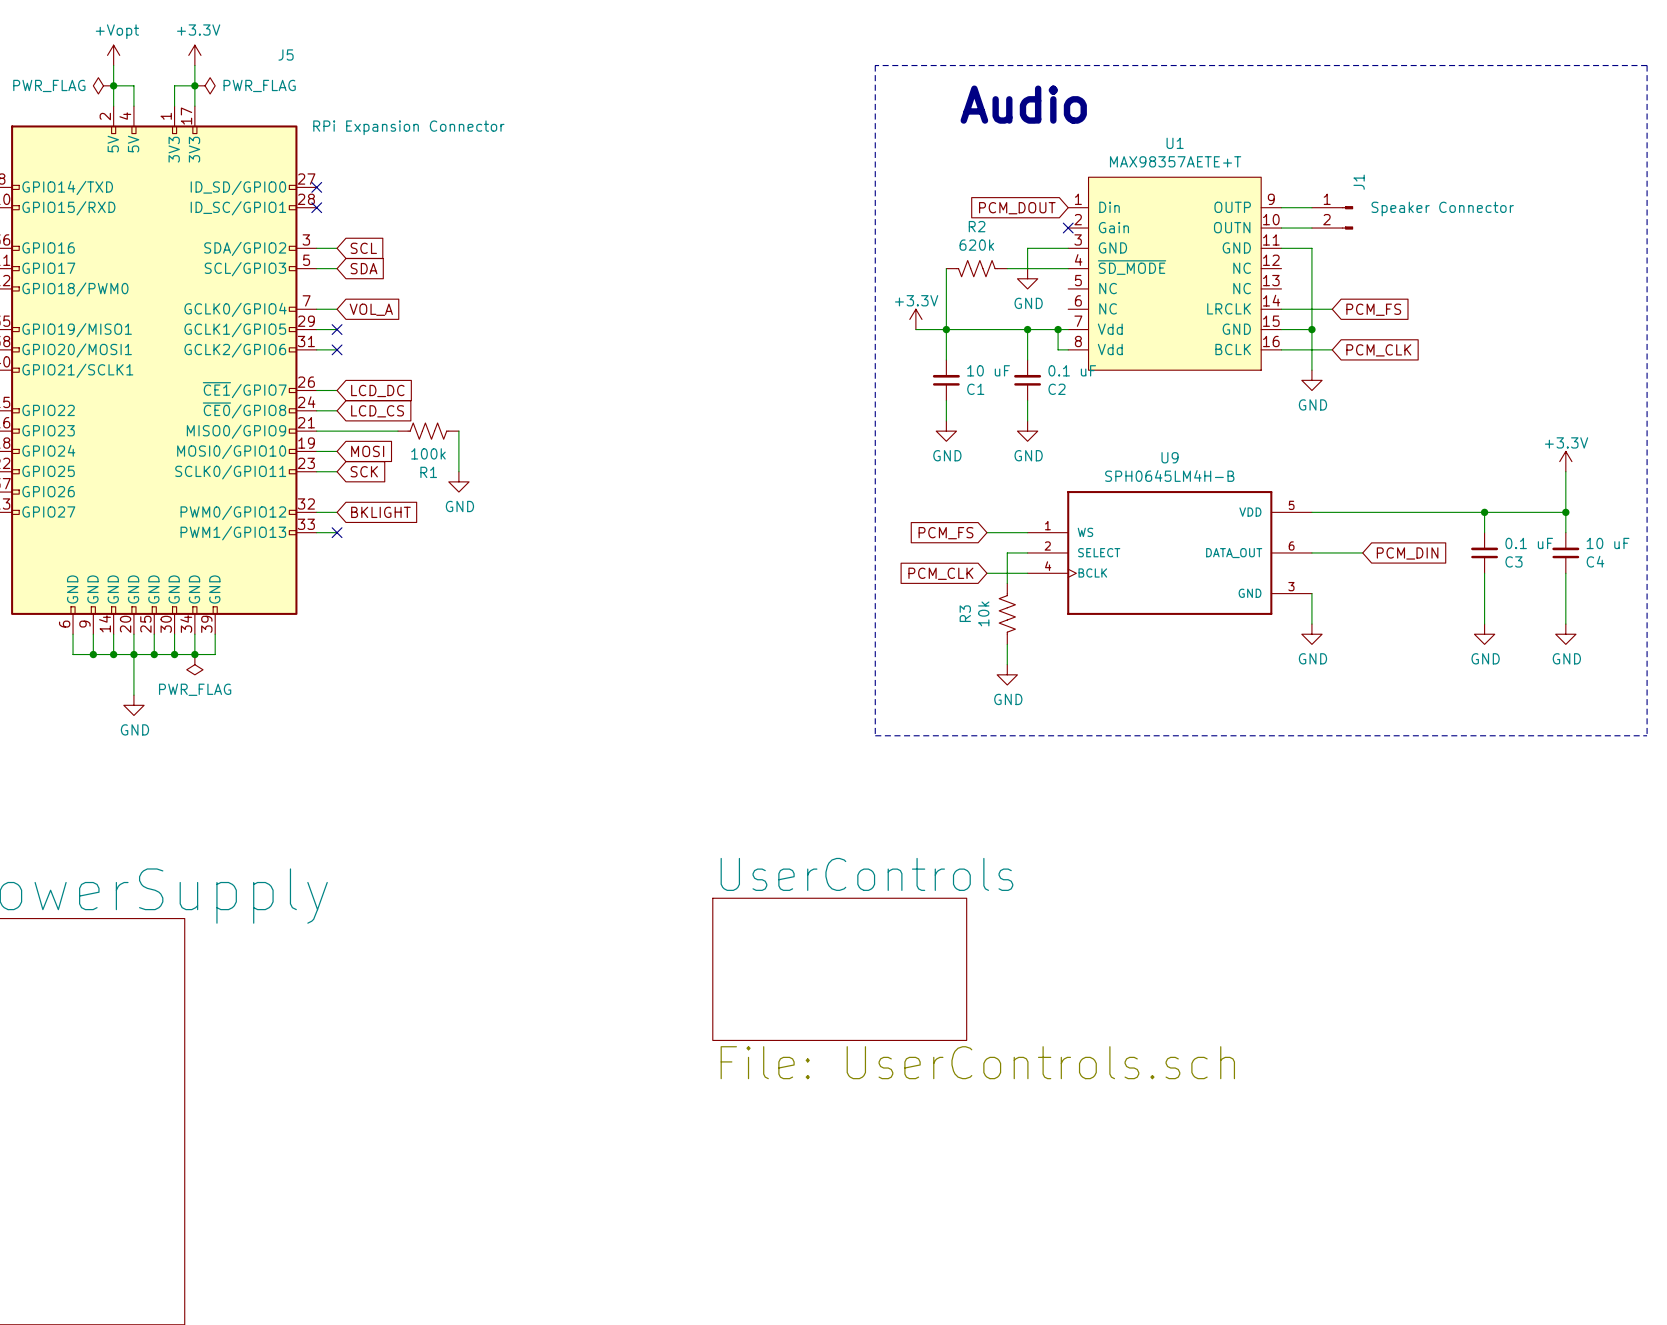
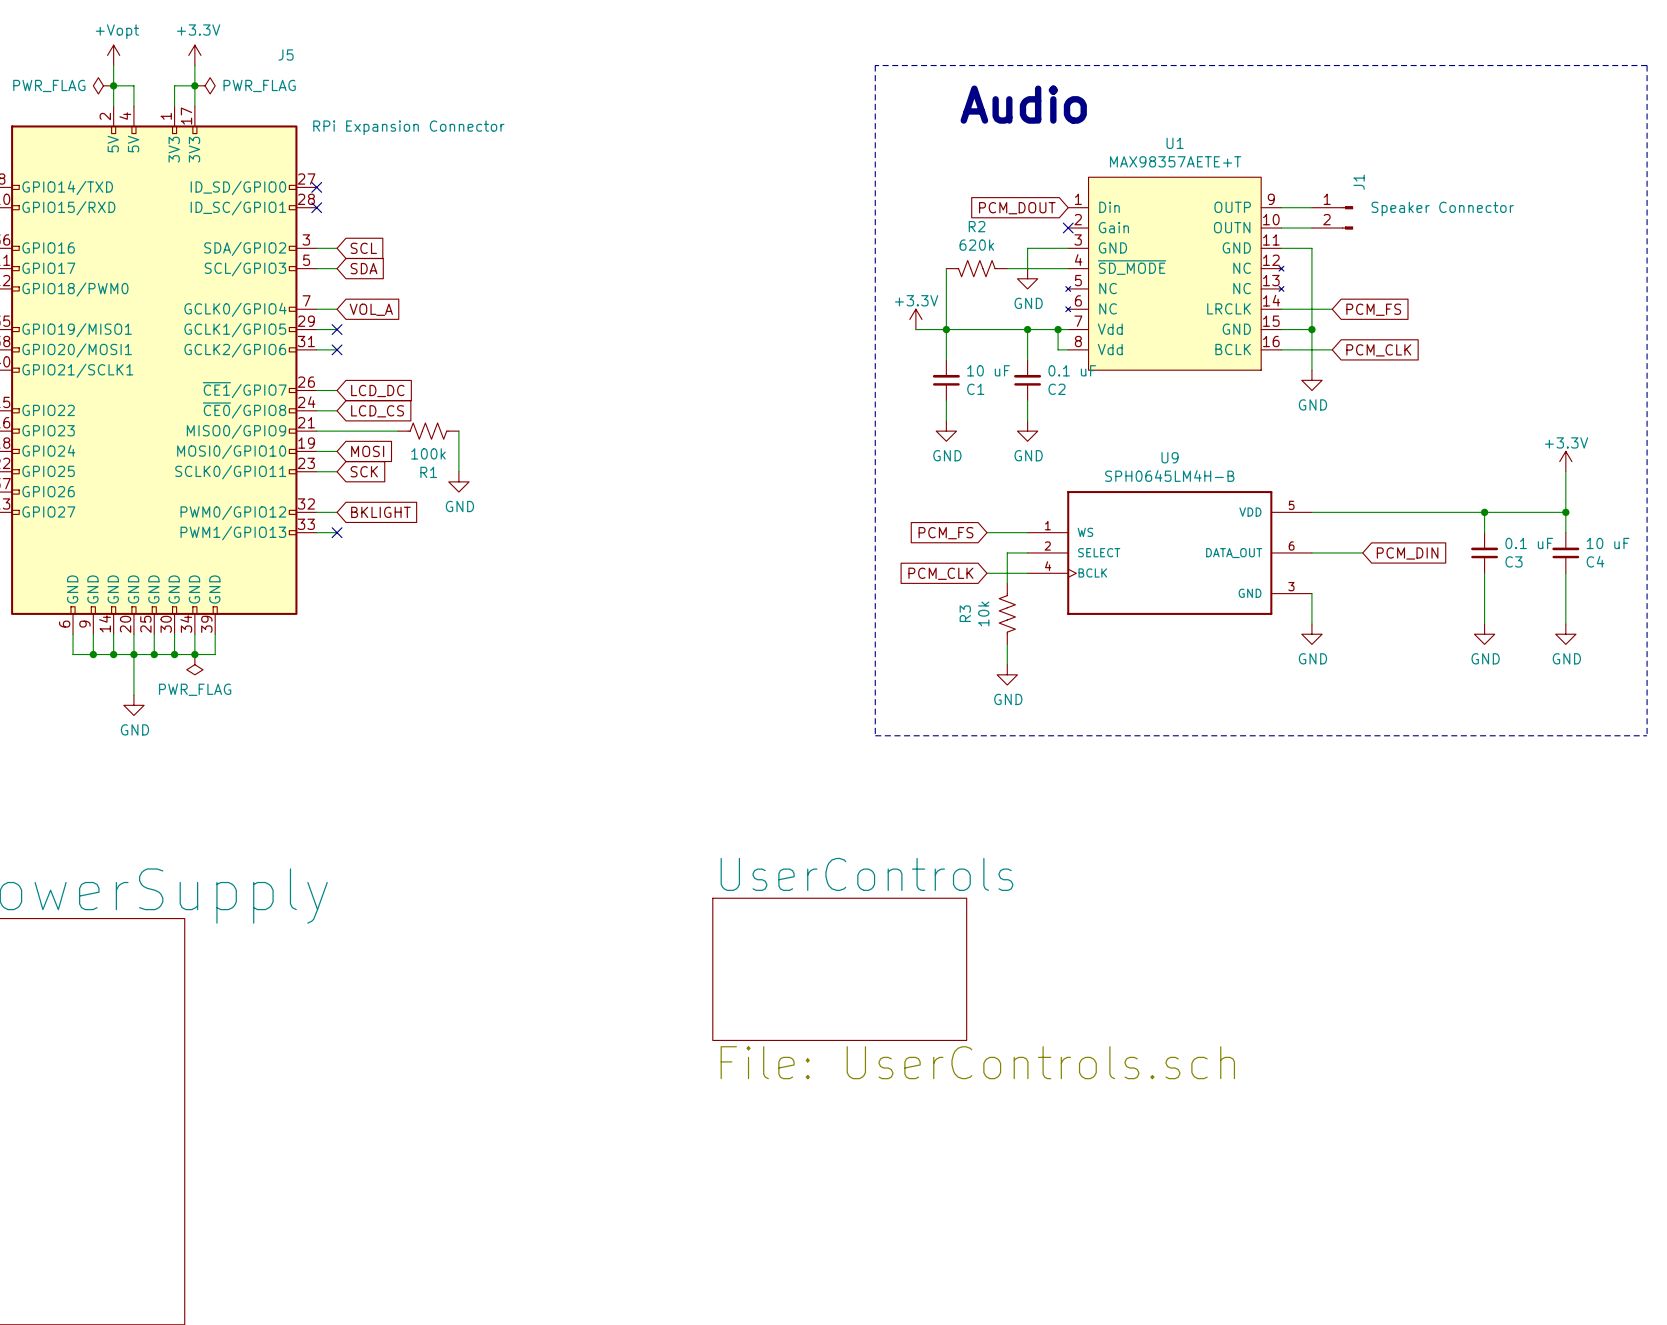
U1 symbol: [1068, 177, 1282, 371] -> [1065, 177, 1284, 371]

